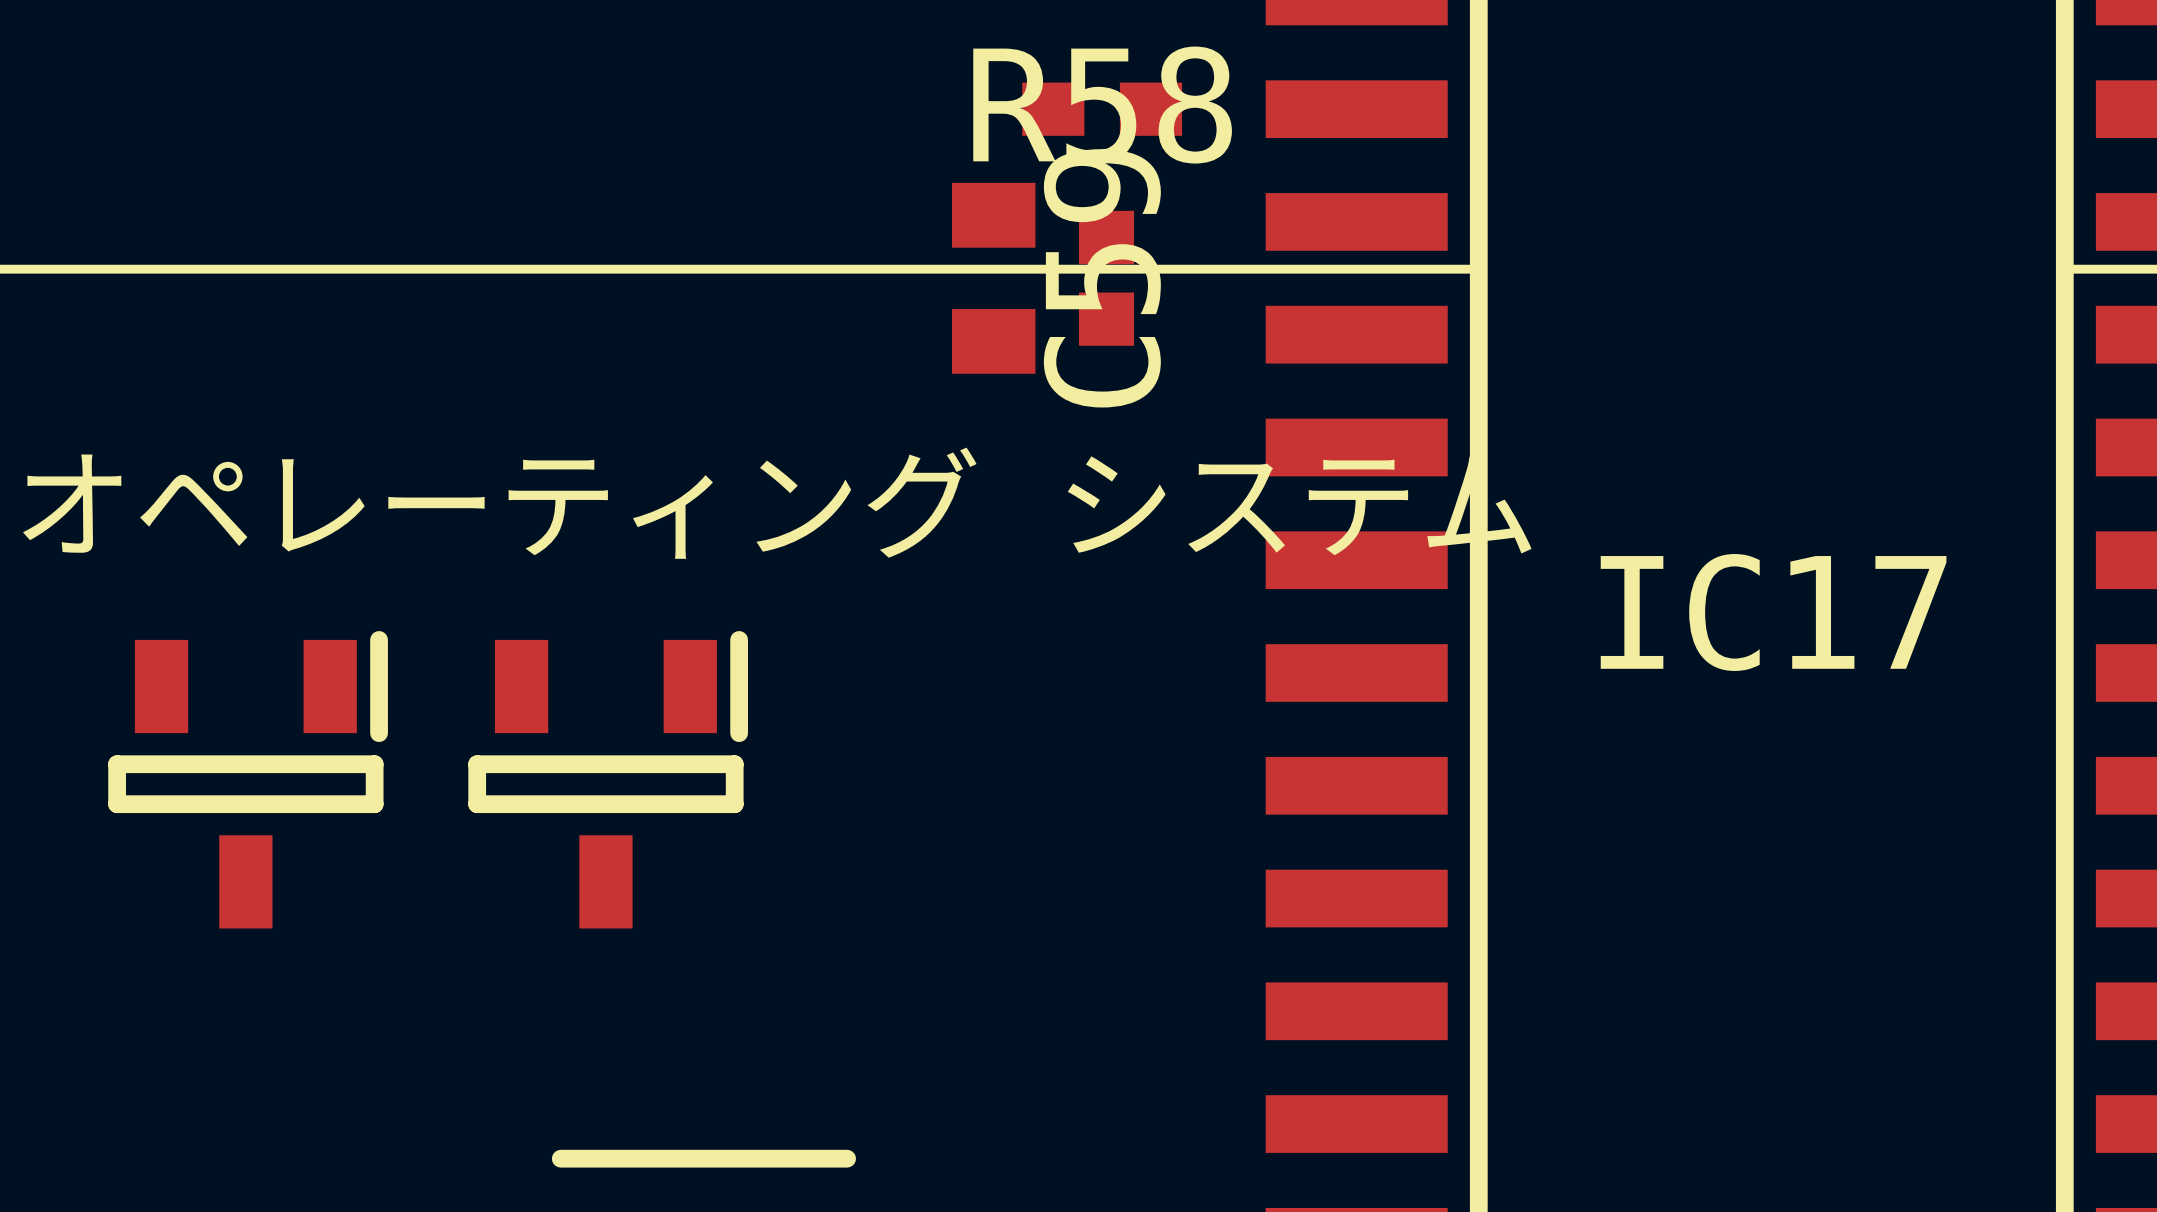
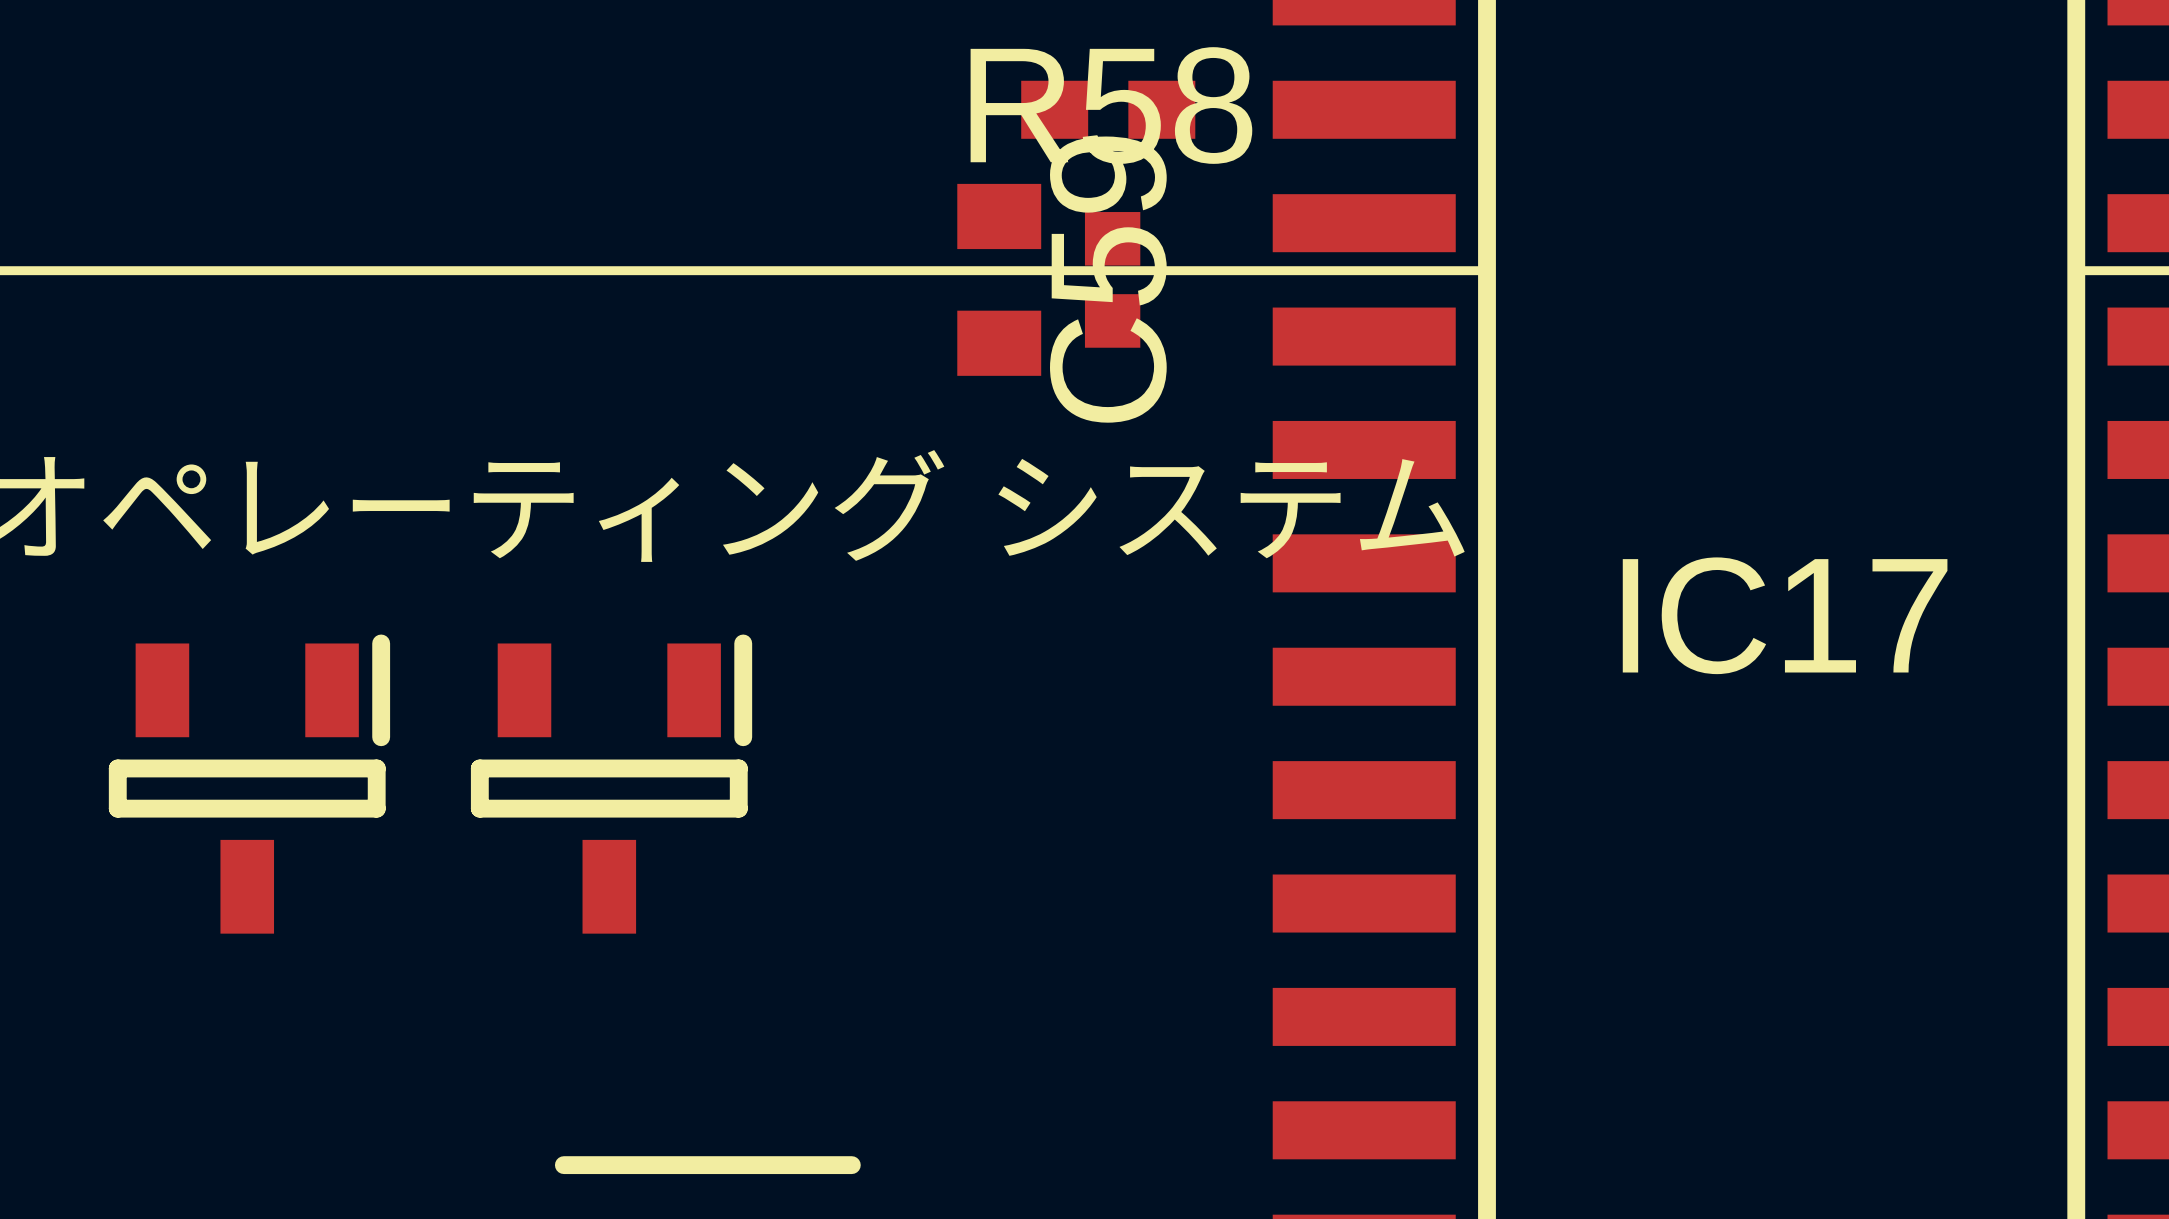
R58 footprint: [1022, 82, 1183, 136] -> [1021, 80, 1196, 139]

